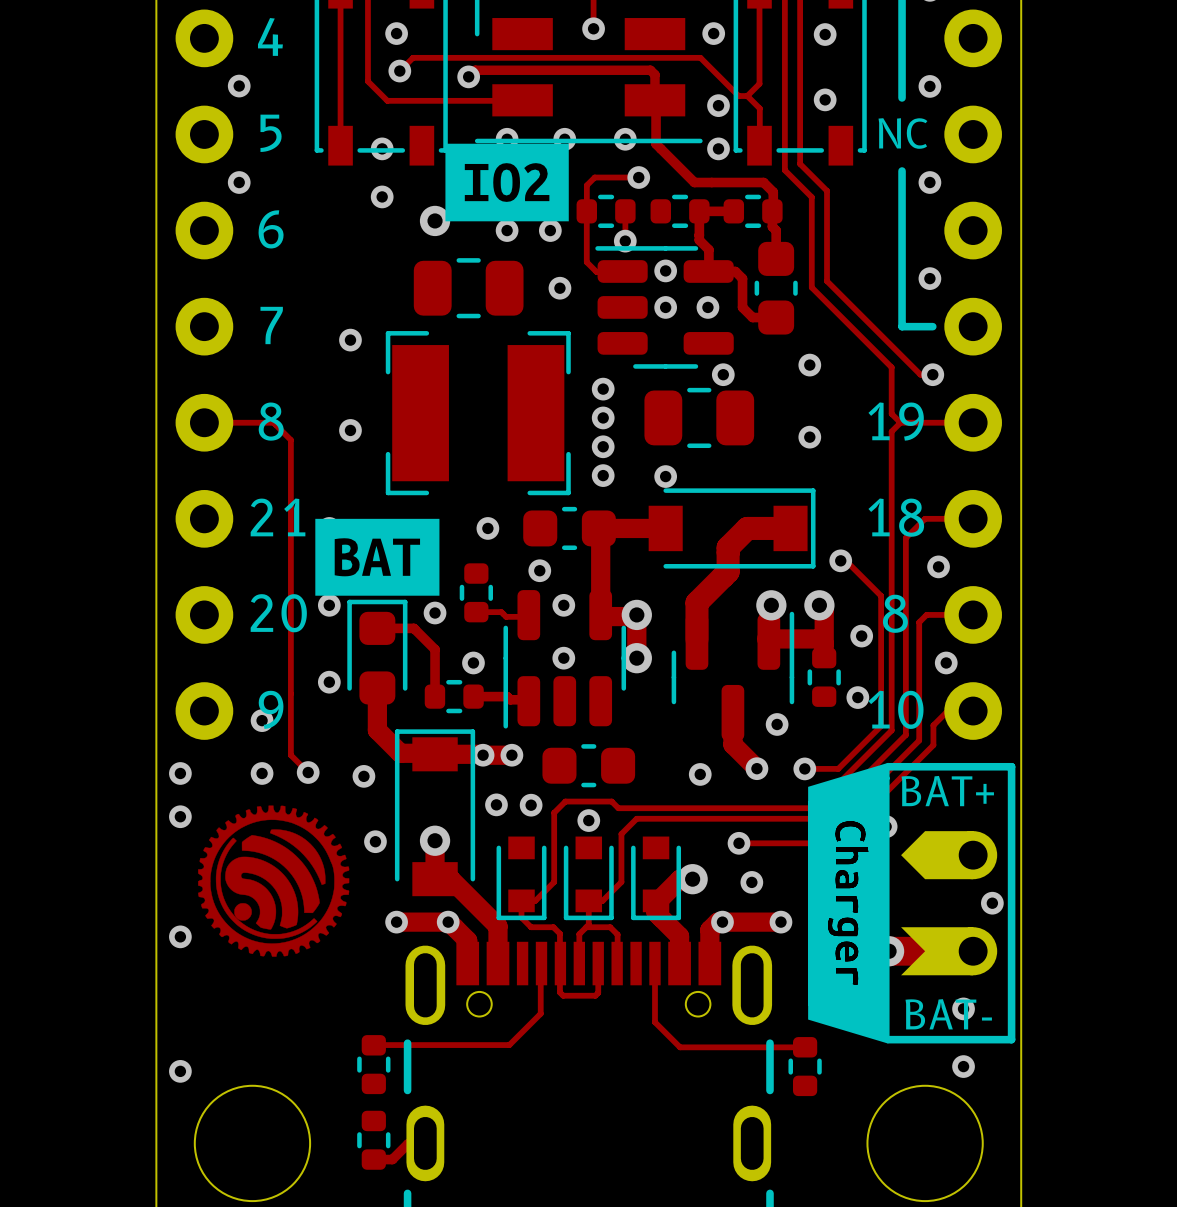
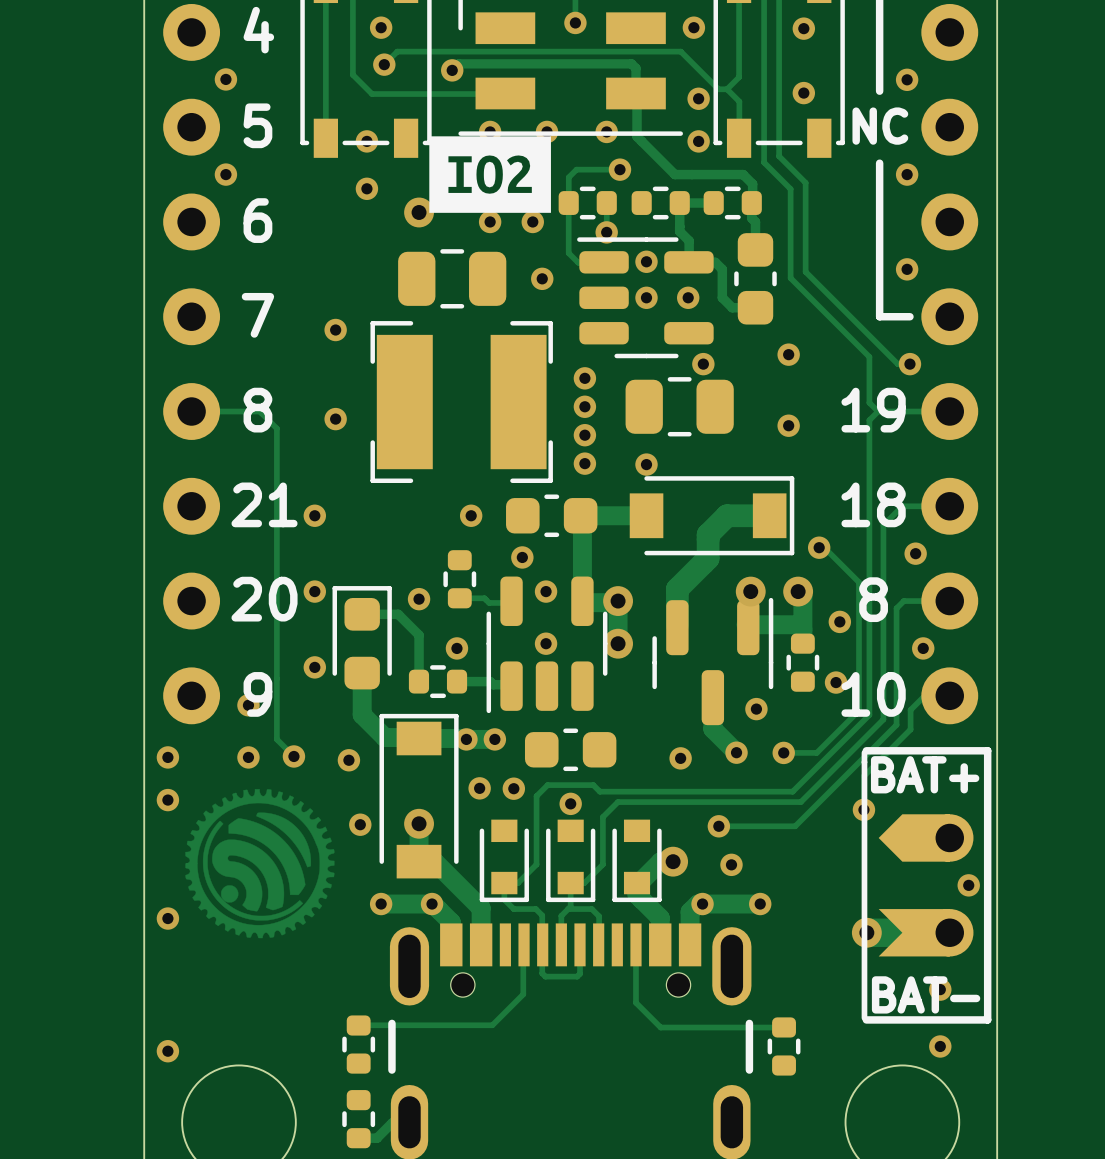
drawing: [315, 518, 440, 596] -> none
drawing: [808, 762, 889, 1044] -> none

